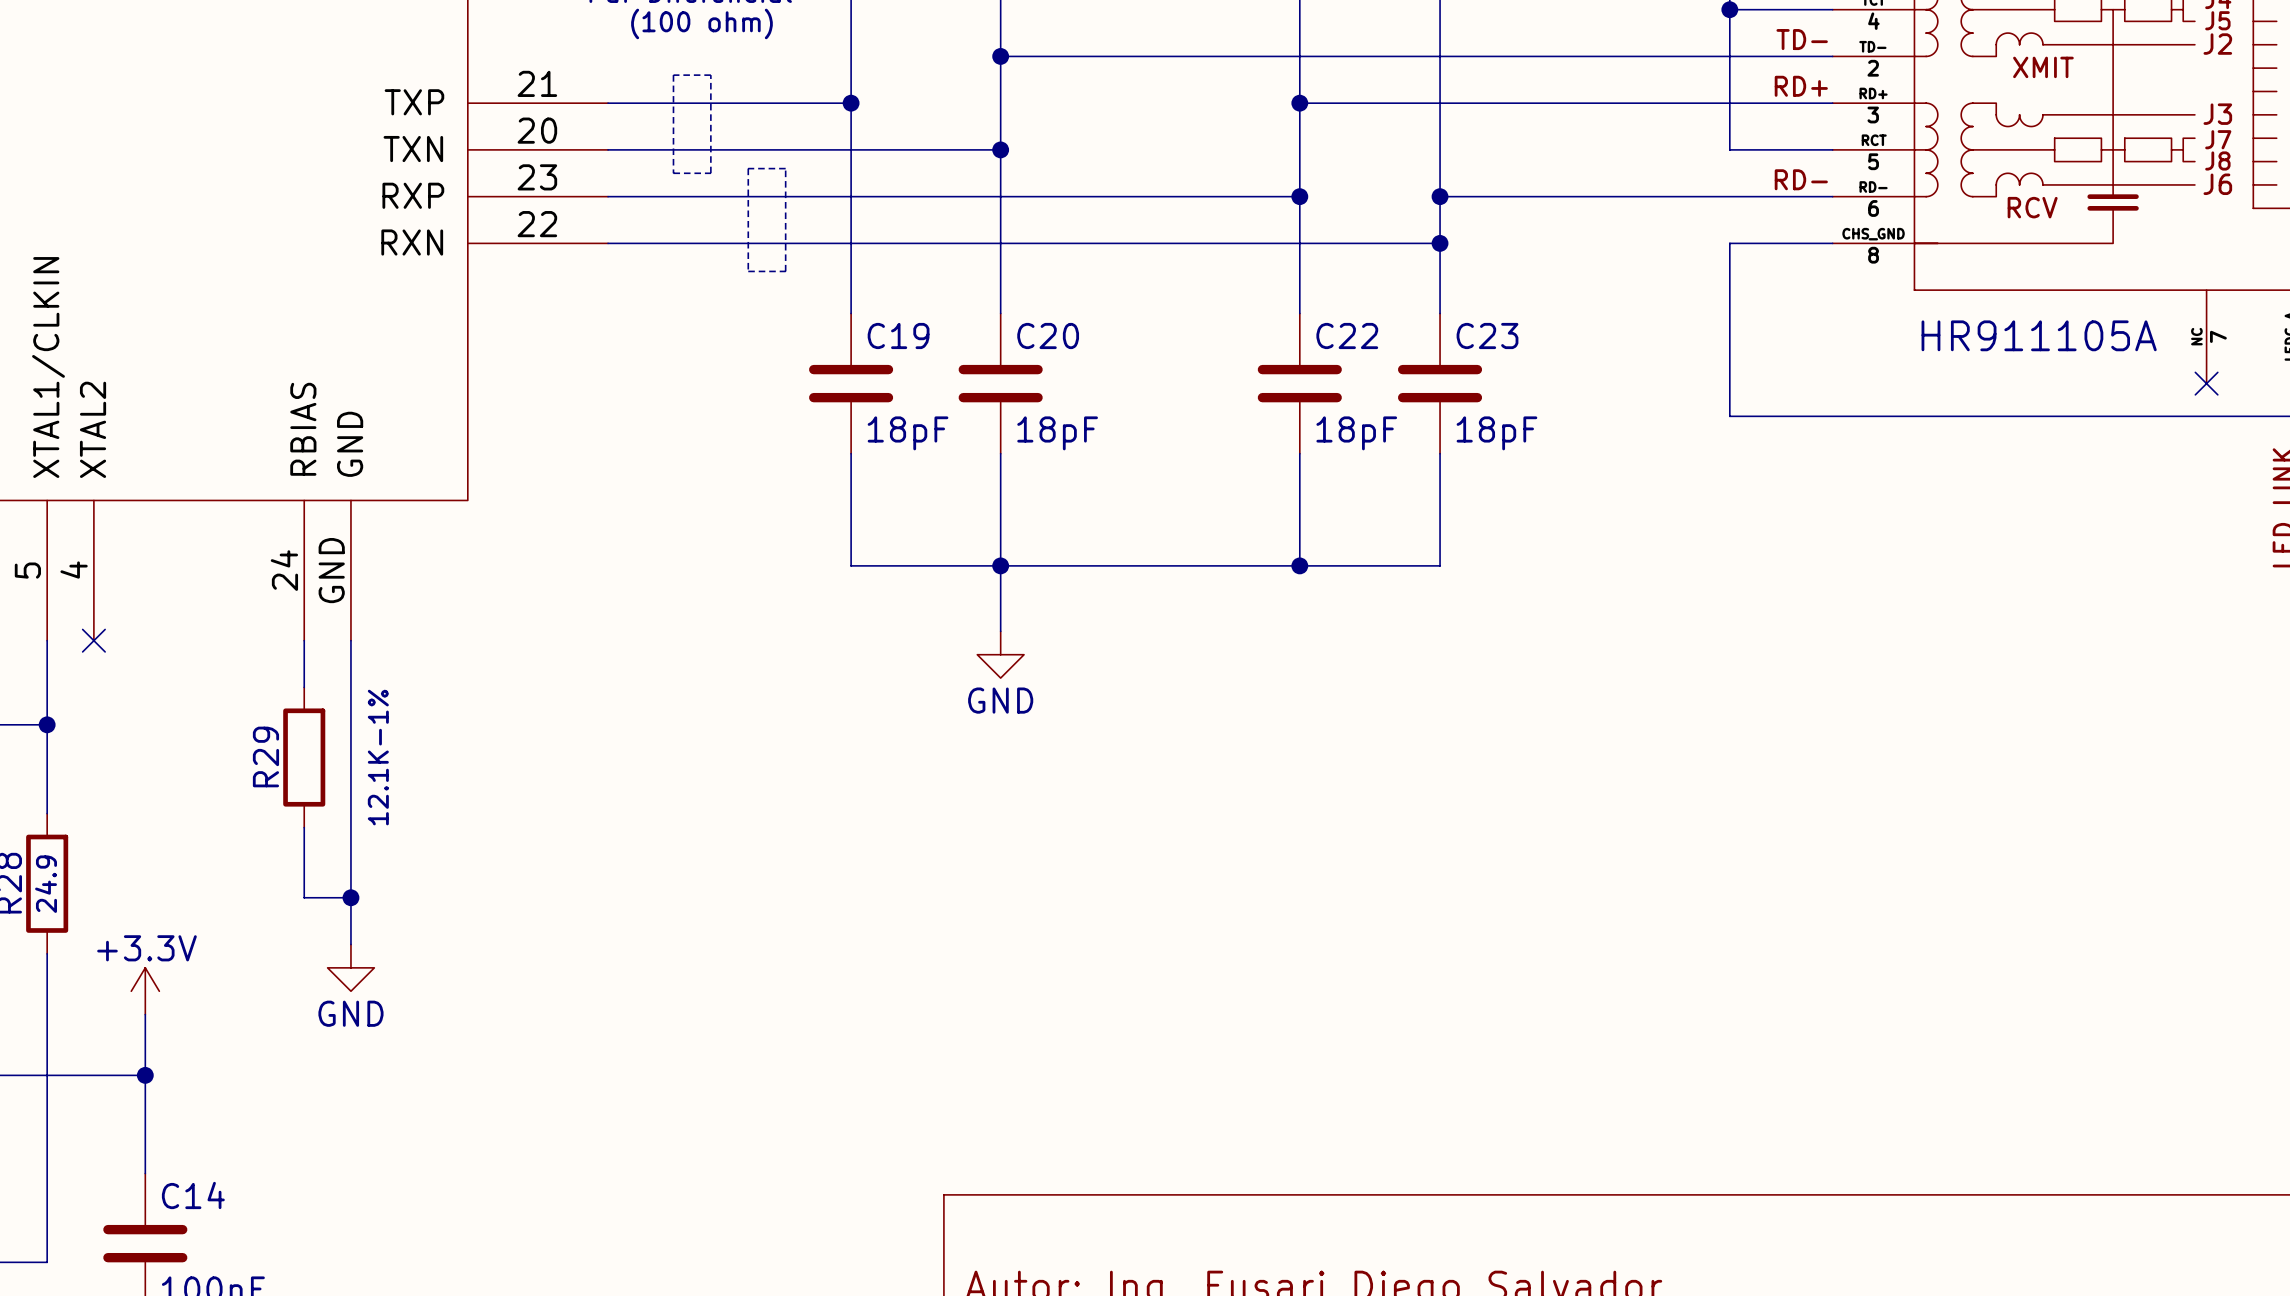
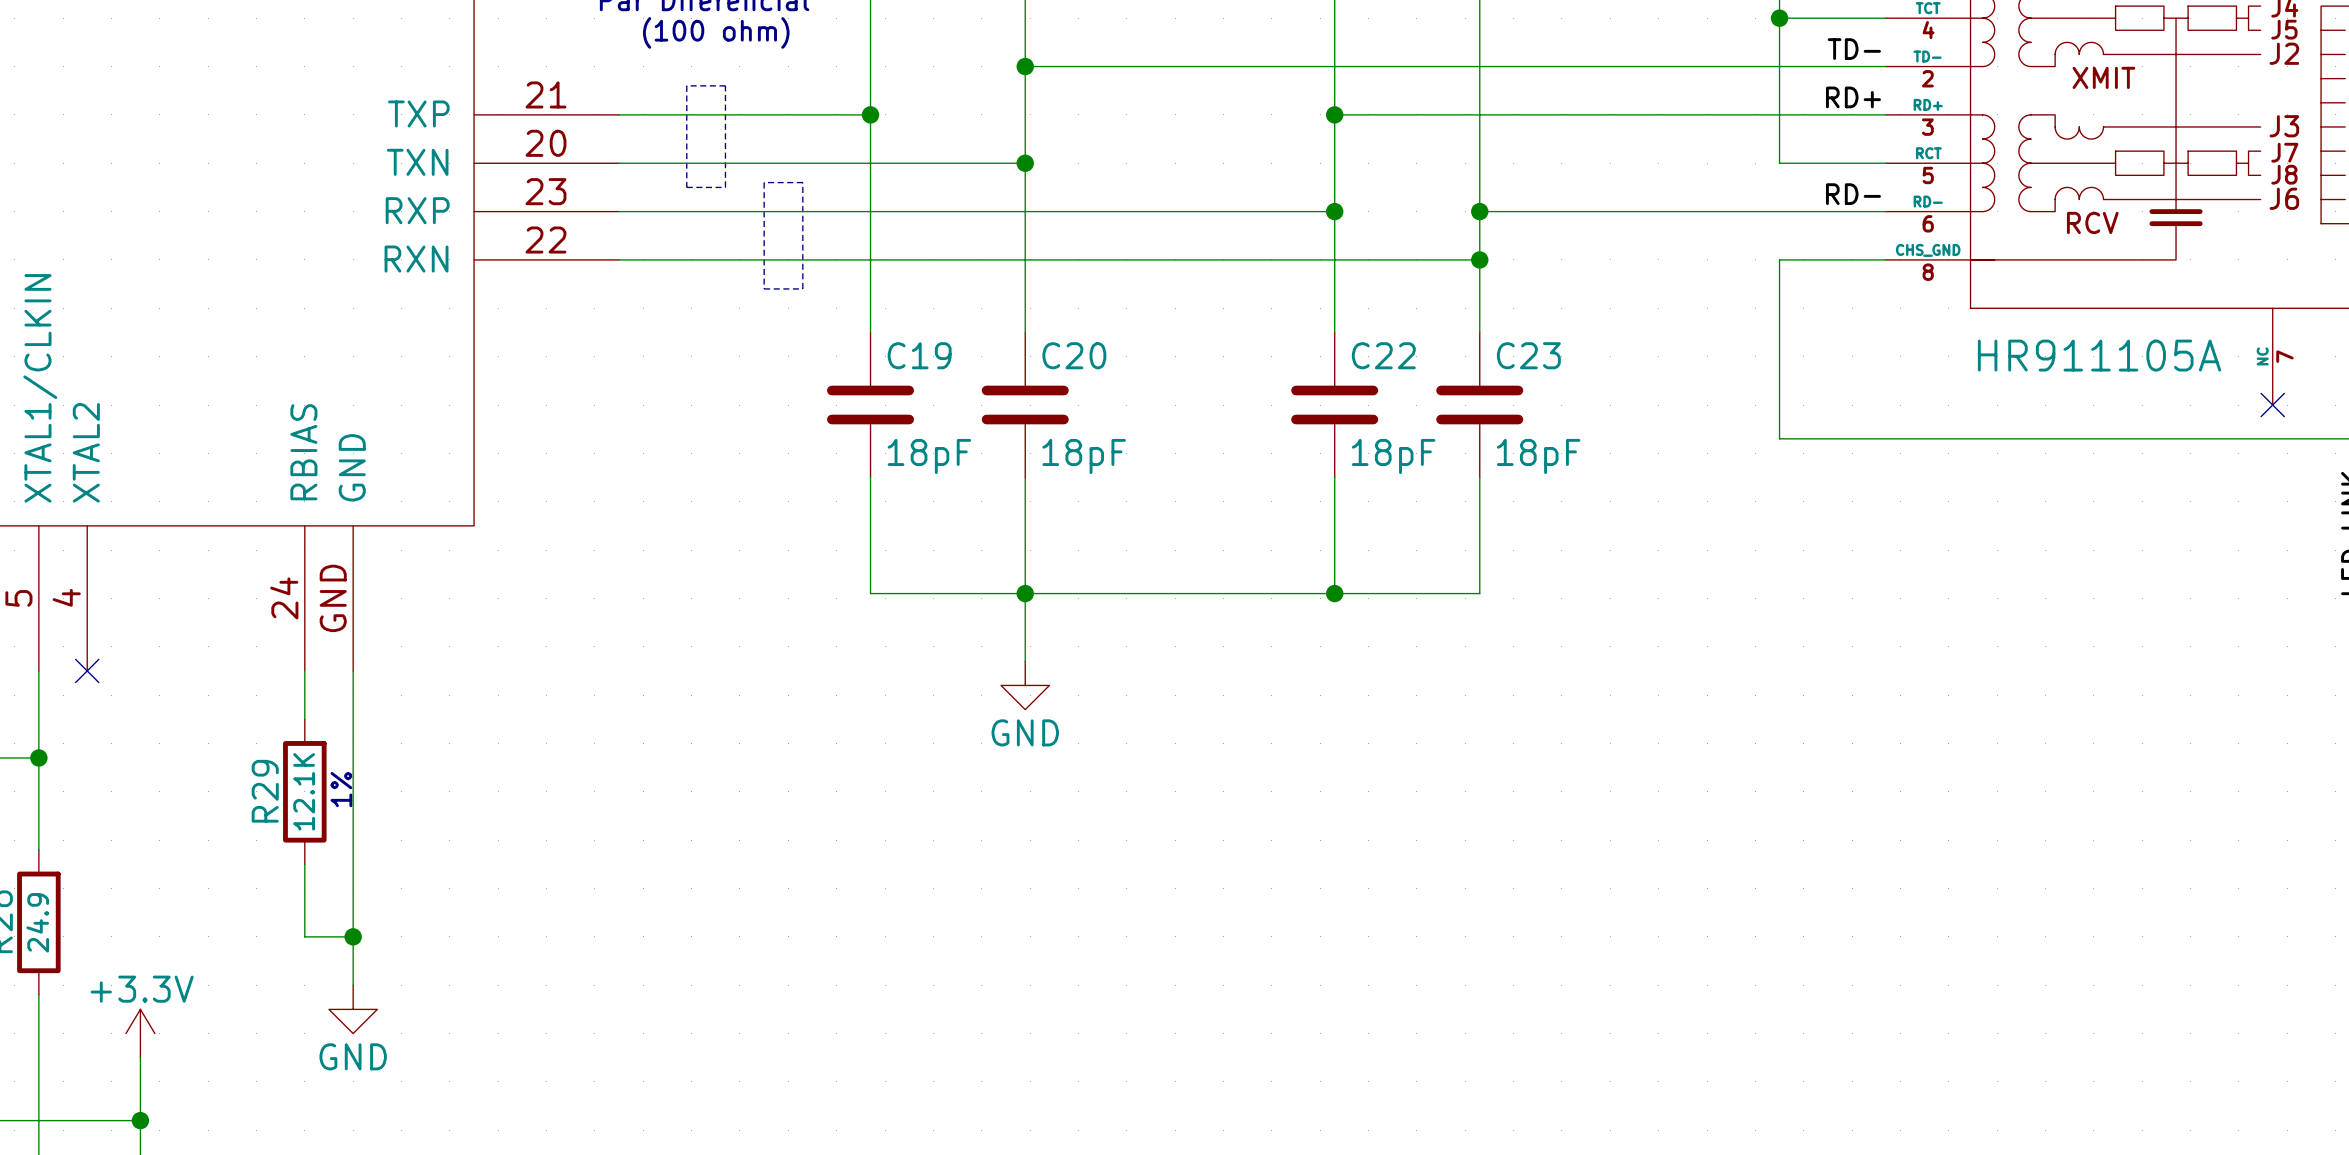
text: none -> 1% (341, 789)
R29 value: 12.1K-1% (378, 757) -> 12.1K (304, 791)

